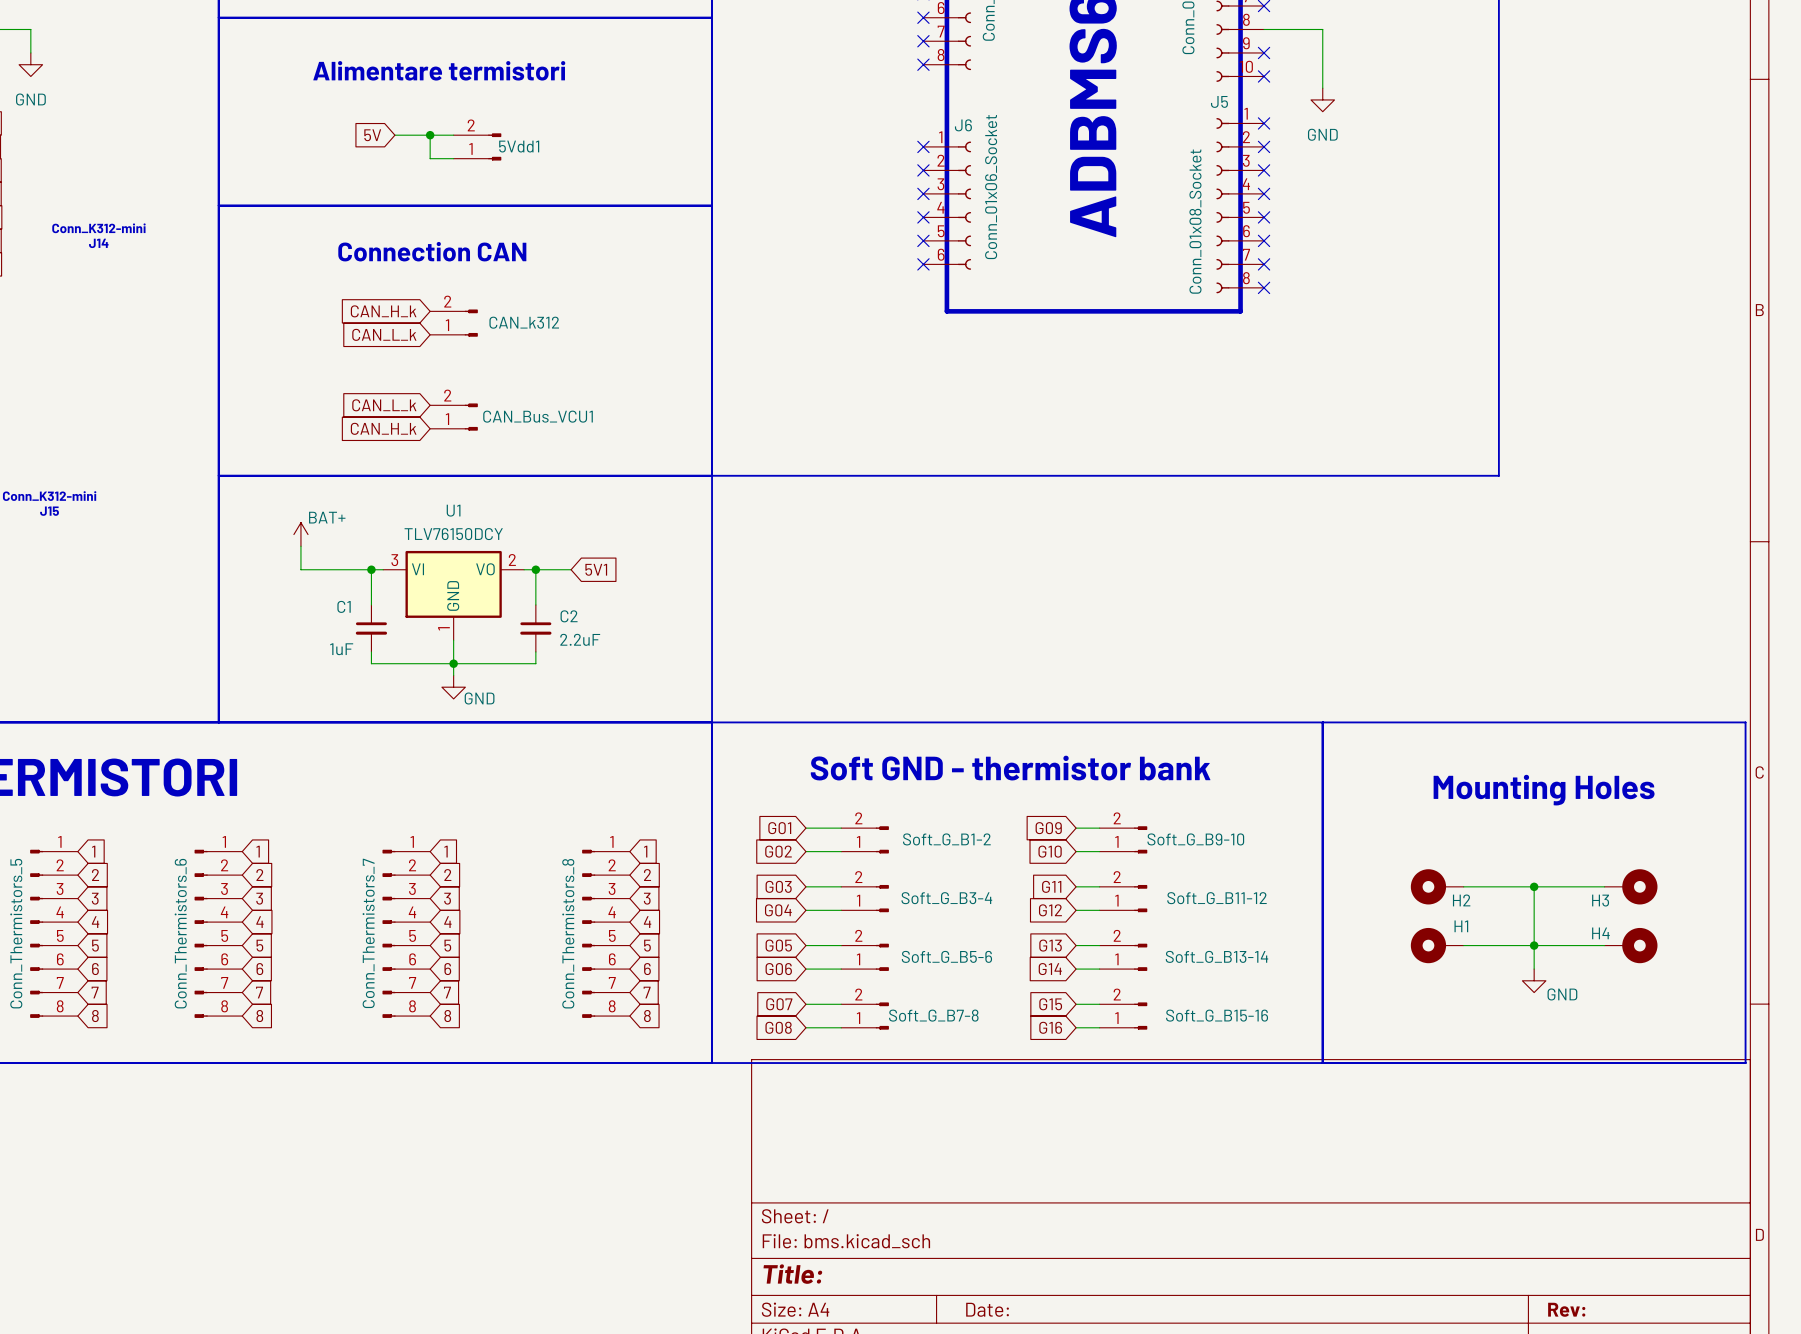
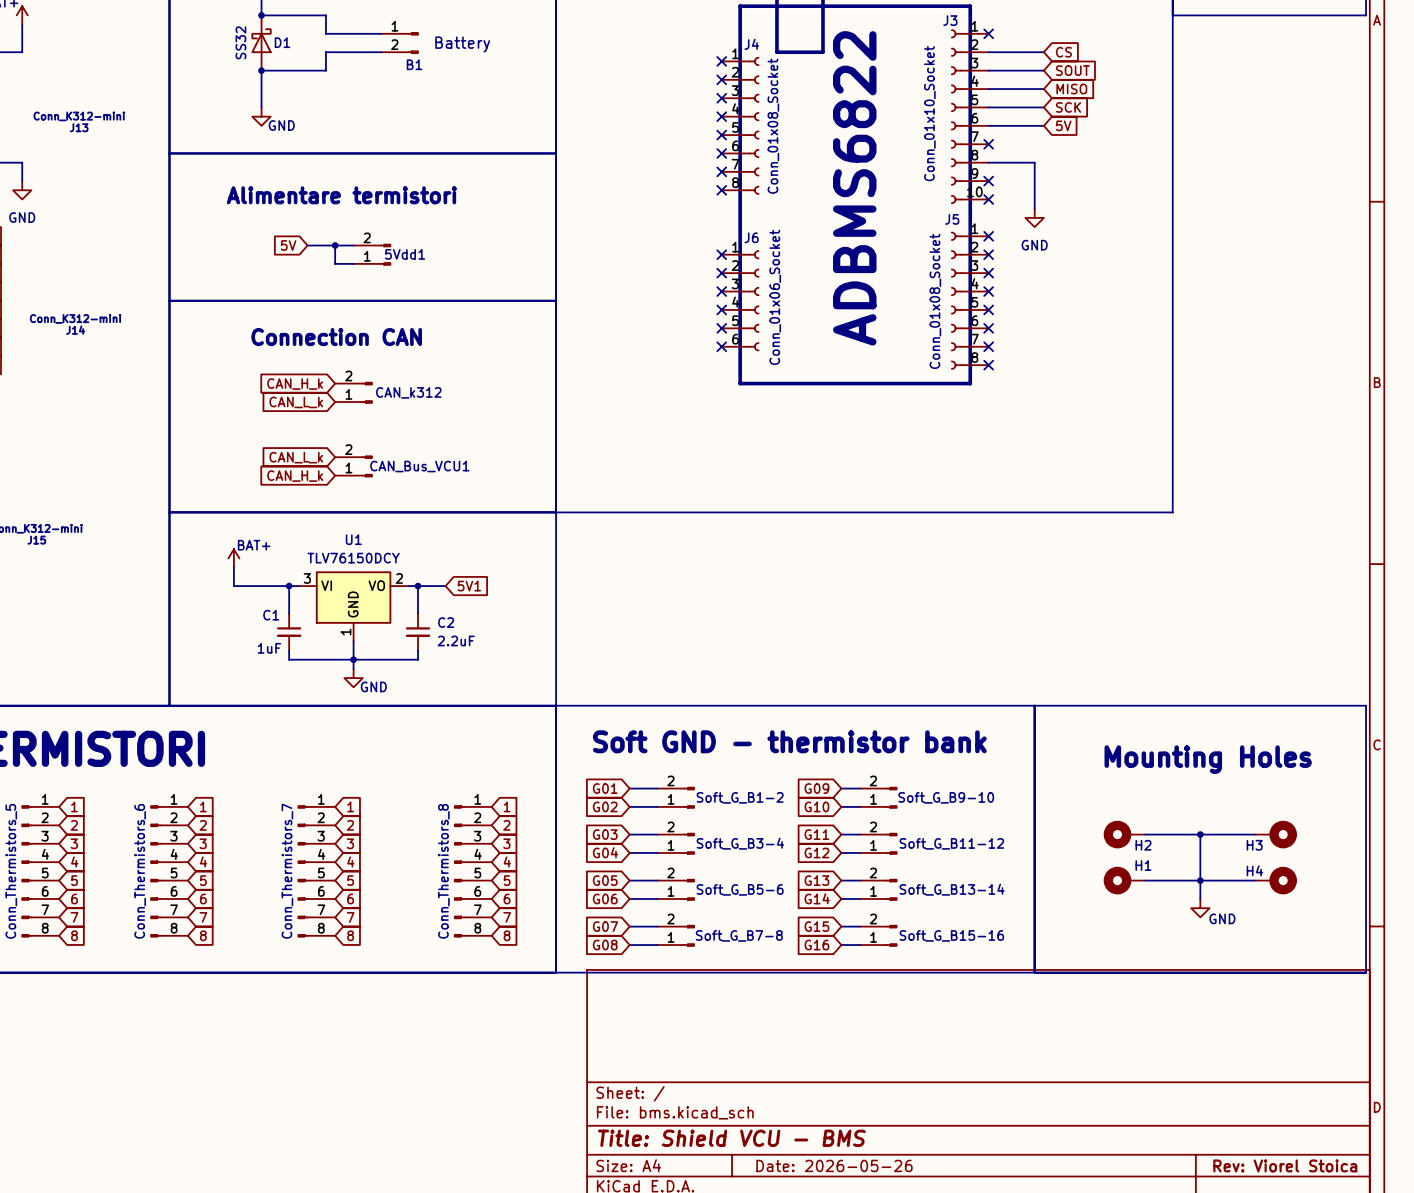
title block: Title: (792, 1274) -> Title: Shield VCU - BMS (731, 1138)
title block: Date: (987, 1309) -> Date: 2026-05-26 (834, 1165)
title block: Rev: (1566, 1309) -> Rev: Viorel Stoica (1285, 1165)

